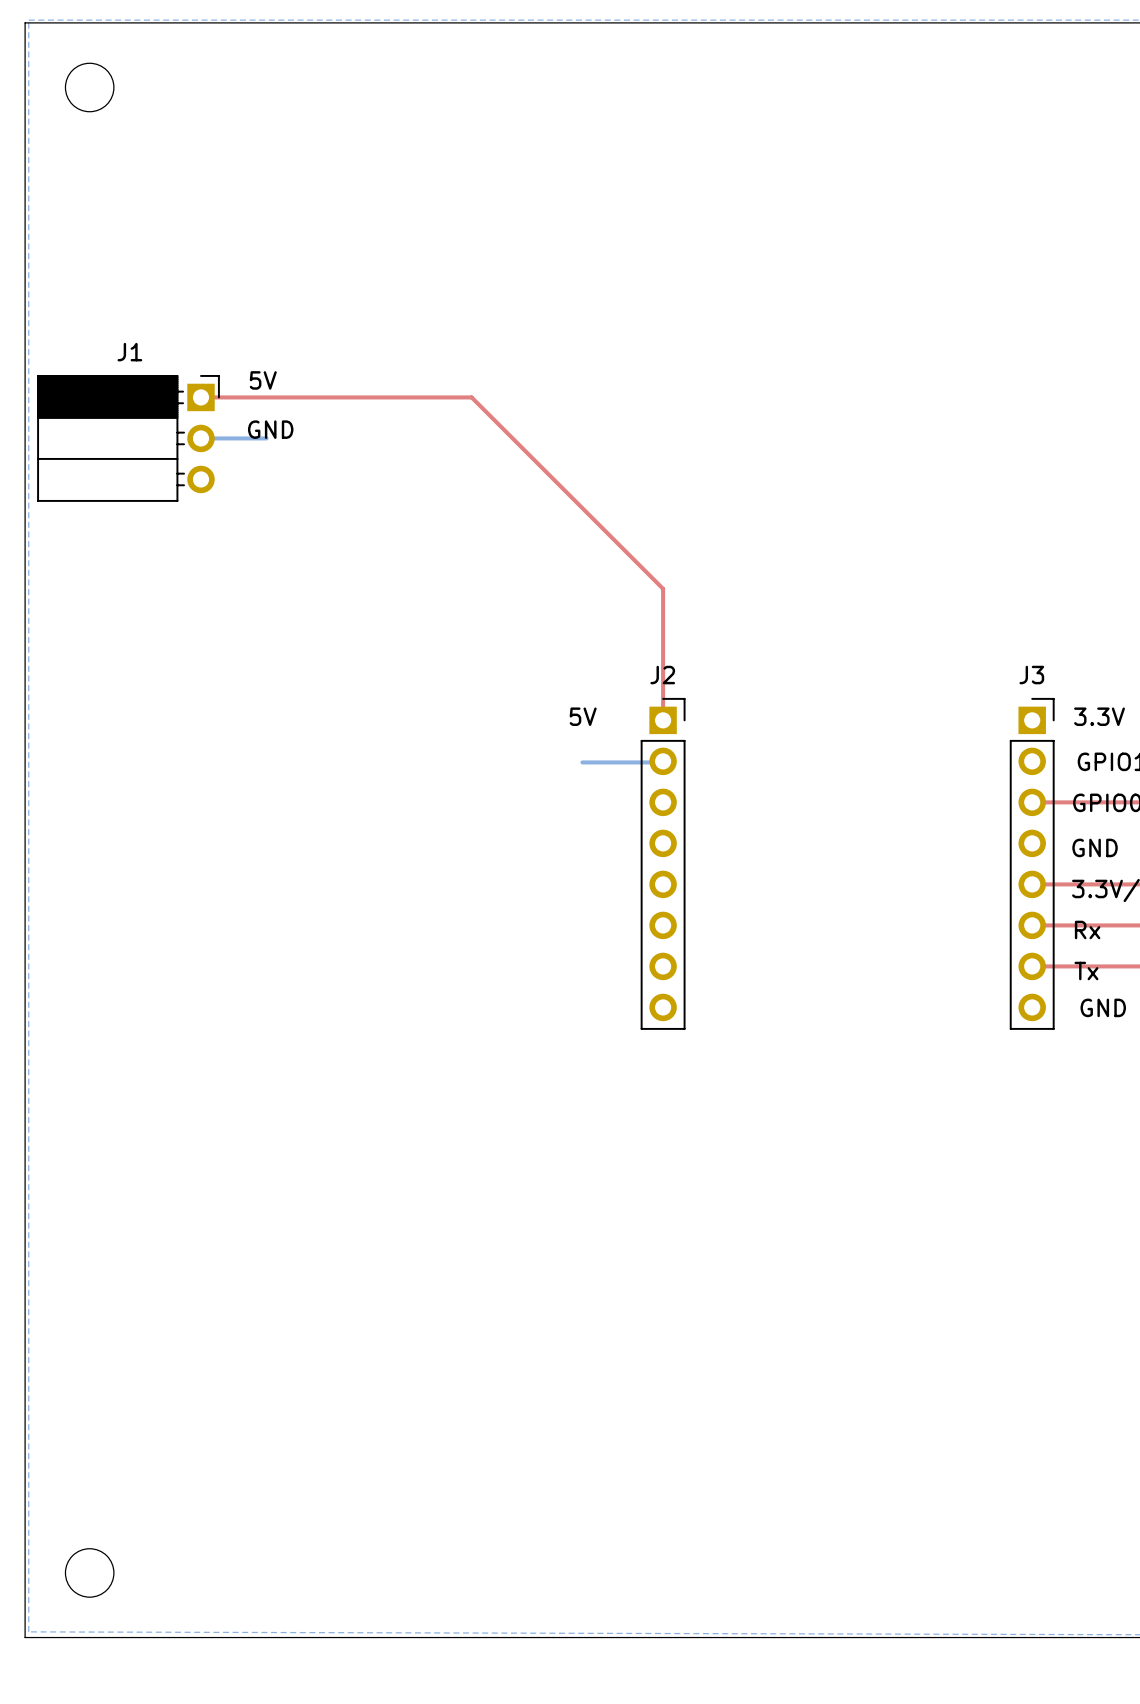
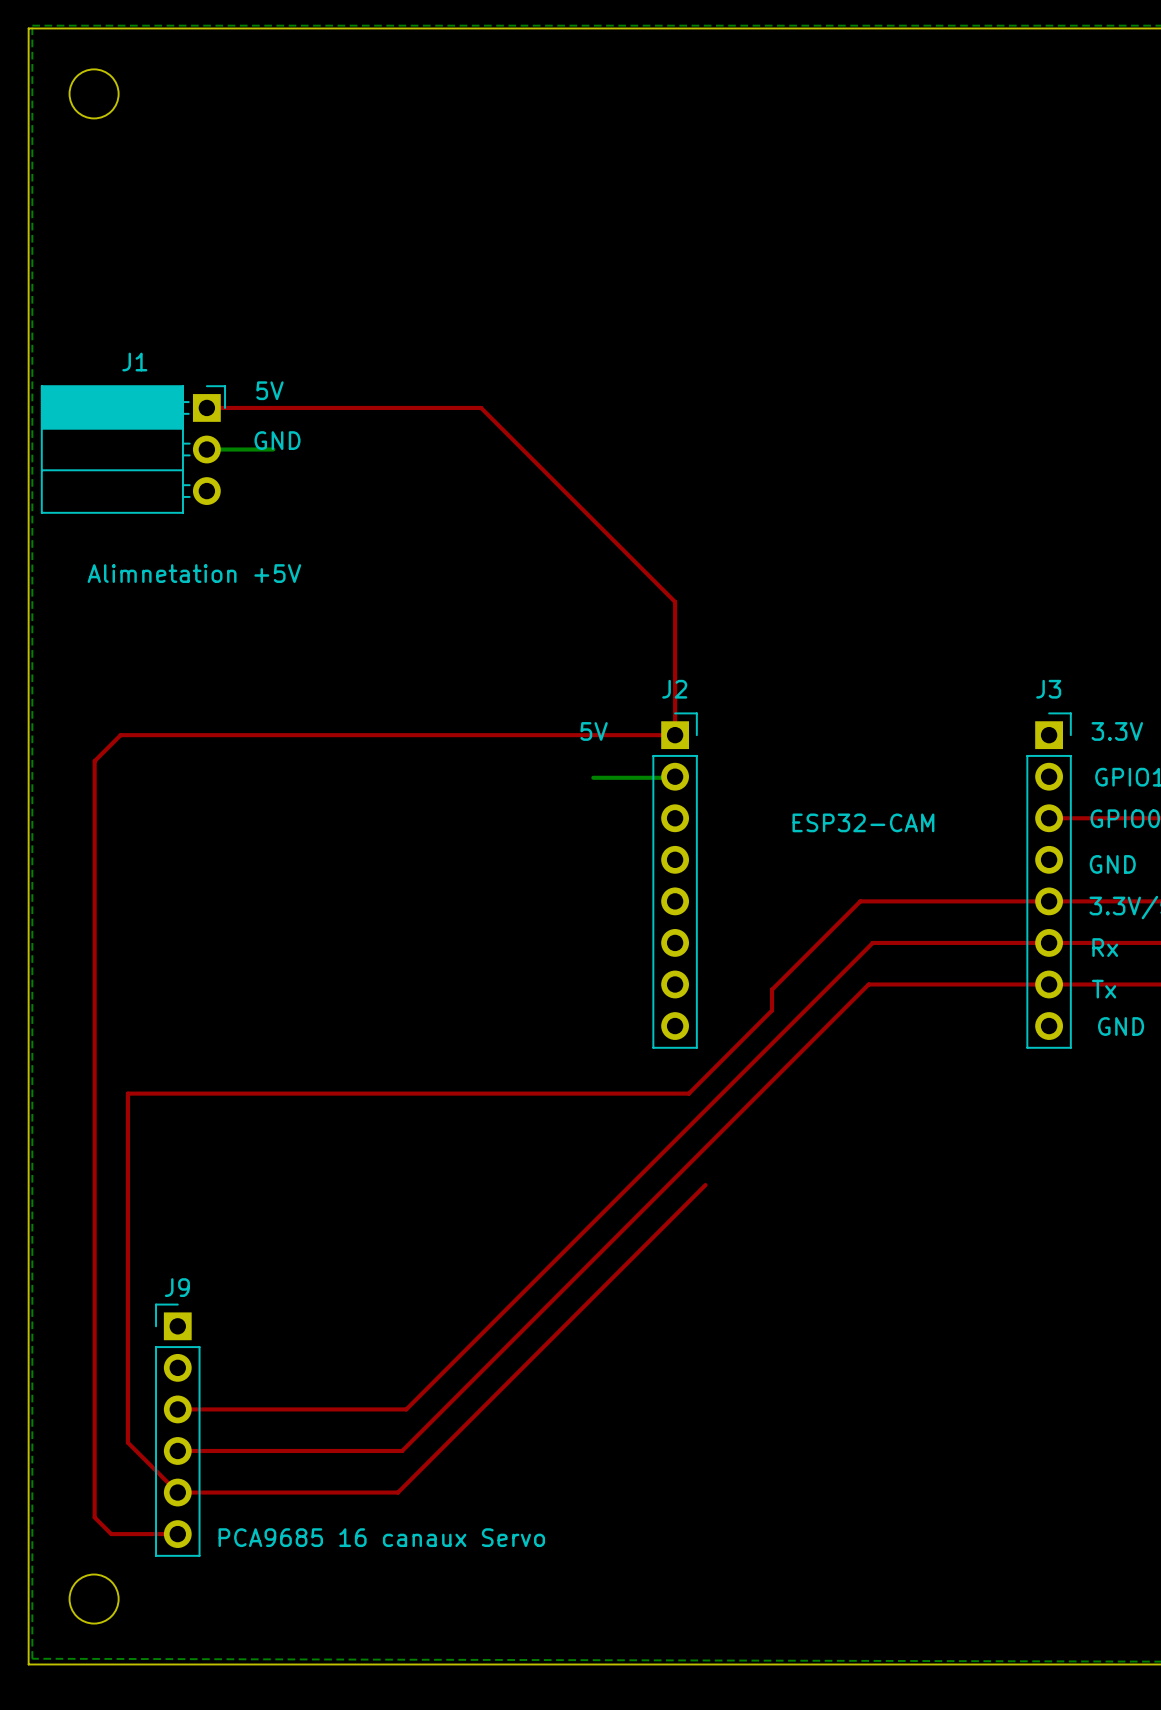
text: none -> Alimnetation +5V (194, 573)
top track: none -> (675, 735) (120, 735) (94, 761) (94, 1517) (111, 1534) (177, 1534)
text: none -> ESP32-CAM (863, 822)
top track: none -> (1049, 901) (860, 901) (772, 989) (772, 1010) (688, 1093) (127, 1093) (127, 1442) (177, 1492) (398, 1492) (705, 1185)
top track: none -> (1049, 942) (872, 942) (406, 1409) (177, 1409)
top track: none -> (1049, 984) (868, 984) (402, 1450) (177, 1450)
J9: none -> (177, 1430)
text: none -> PCA9685 16 canaux Servo (381, 1537)

